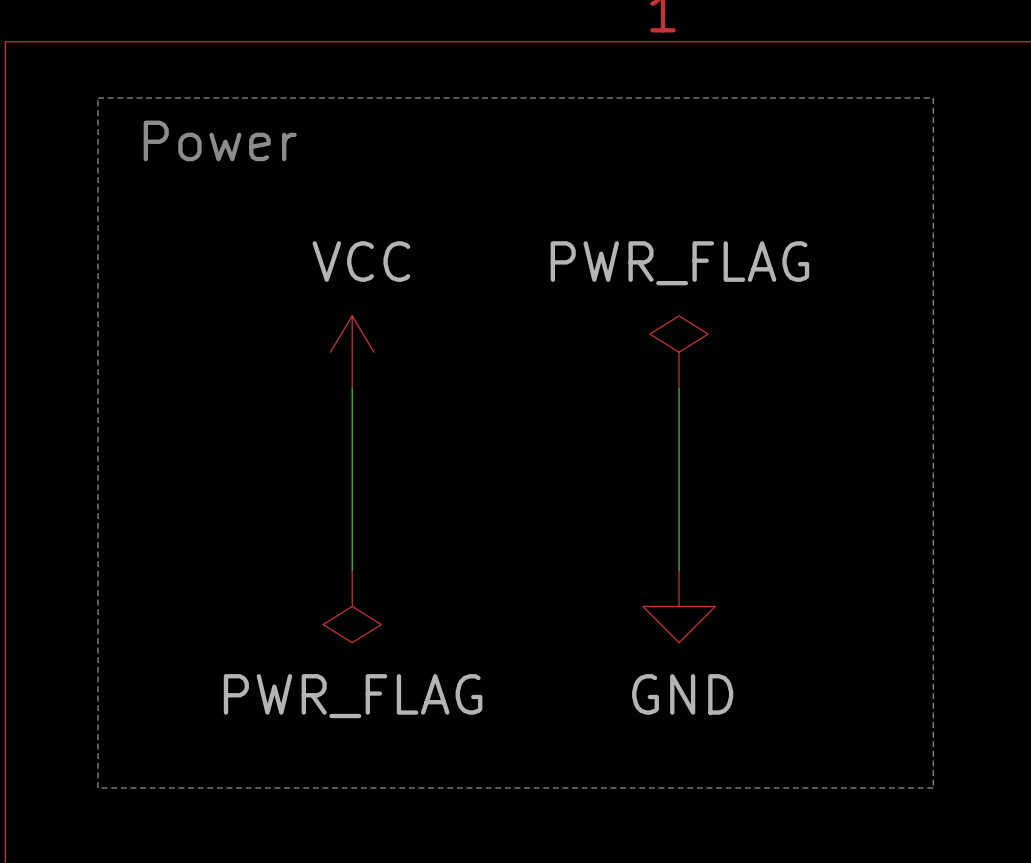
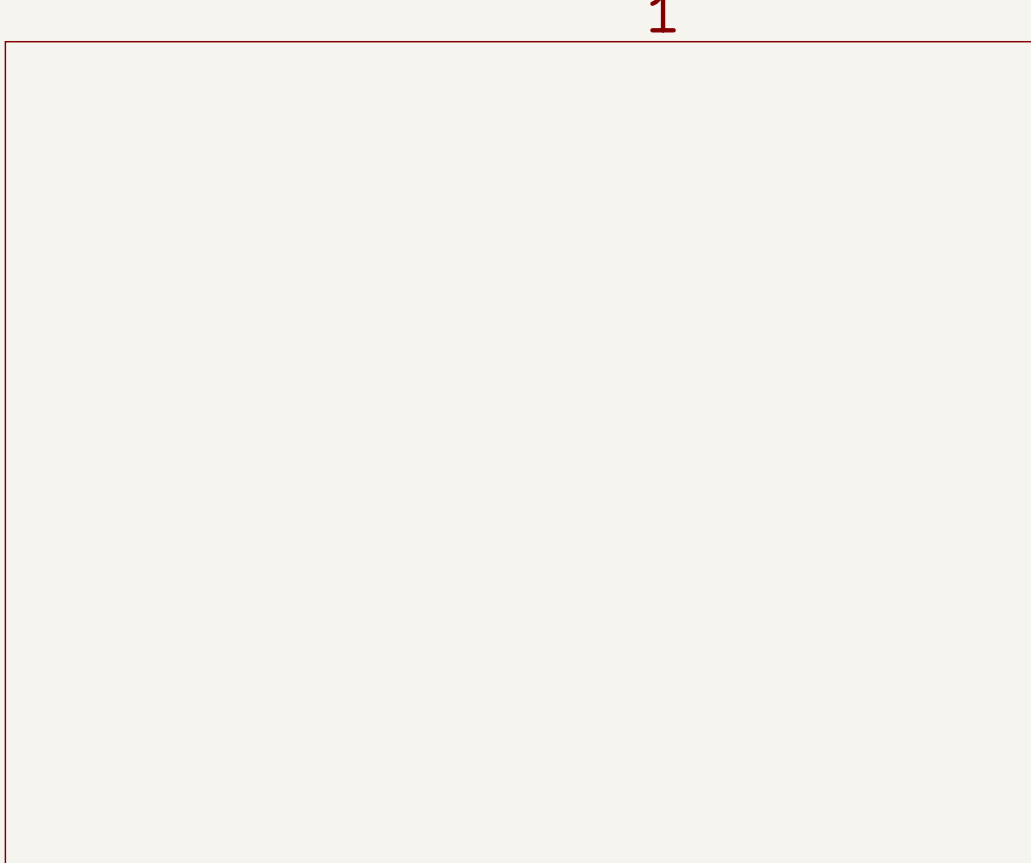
line: (98, 98) (933, 98) (933, 788) (98, 788) (98, 98) -> none
text: Power (220, 140) -> none
power symbol: VCC (352, 352) -> none
power symbol: PWR_FLAG (679, 352) -> none
wire: (352, 388) (352, 570) -> none
wire: (679, 388) (679, 570) -> none
power symbol: PWR_FLAG (352, 606) -> none
power symbol: GND (679, 606) -> none

